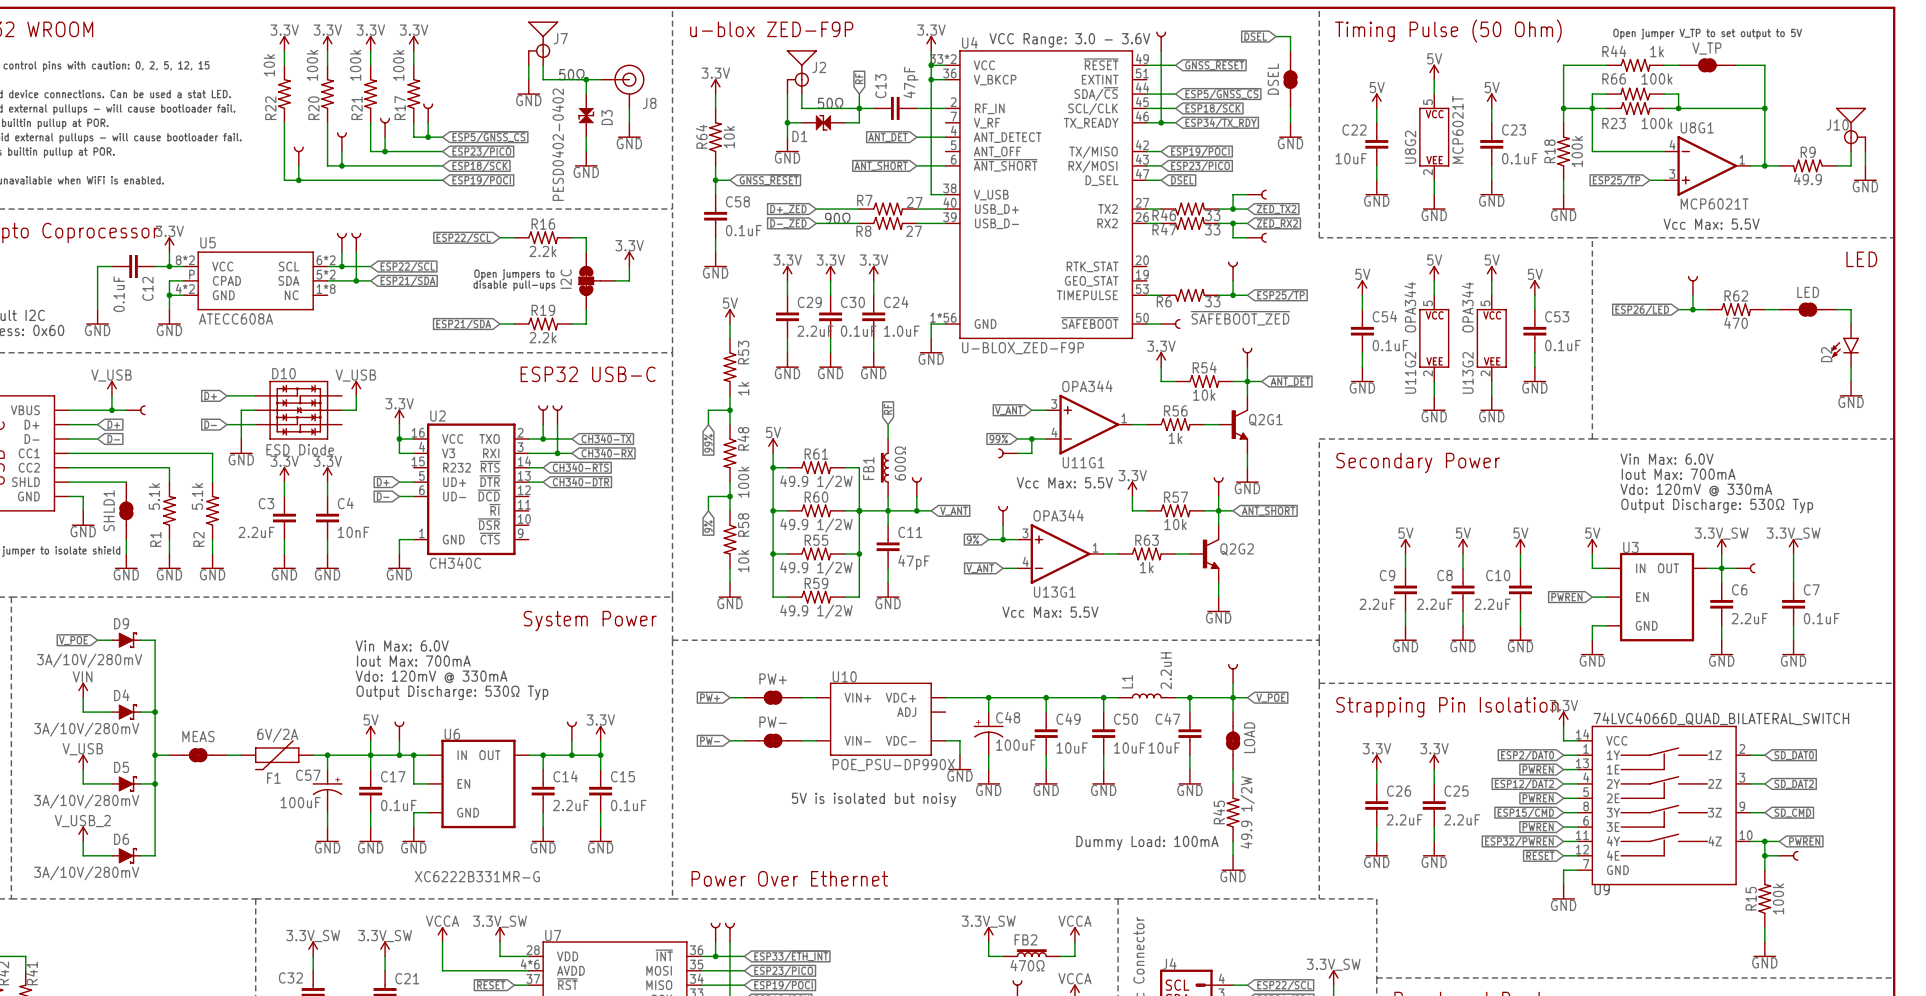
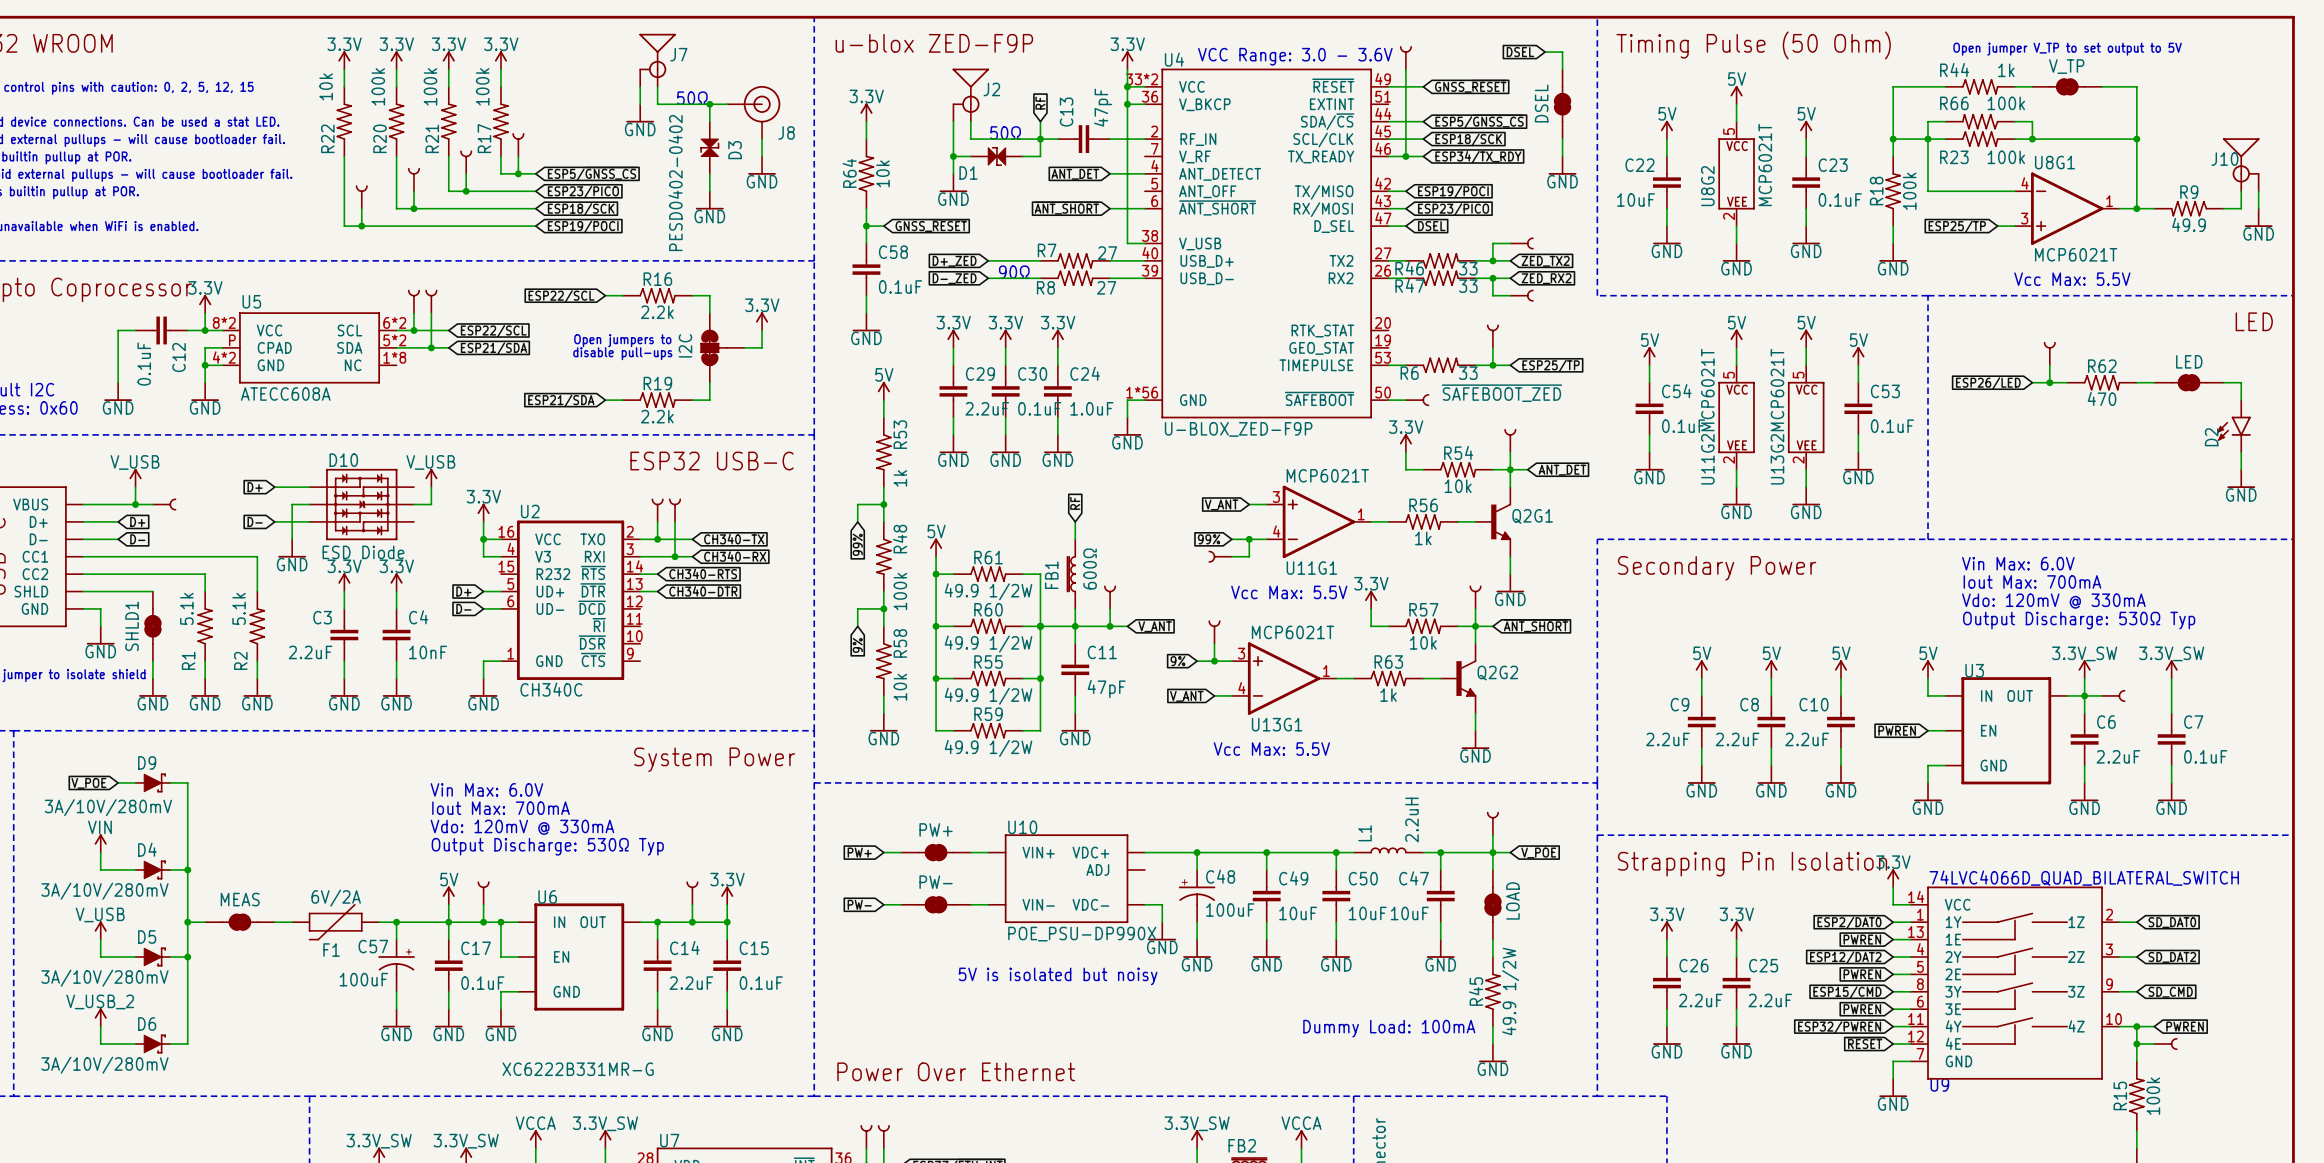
U11G2 value: OPA344 (1410, 307) -> MCP6021T (1707, 390)
U13G2 value: OPA344 (1467, 307) -> MCP6021T (1777, 390)
U11G1 value: OPA344 (1087, 386) -> MCP6021T (1327, 475)
U13G1 value: OPA344 (1058, 515) -> MCP6021T (1293, 632)

